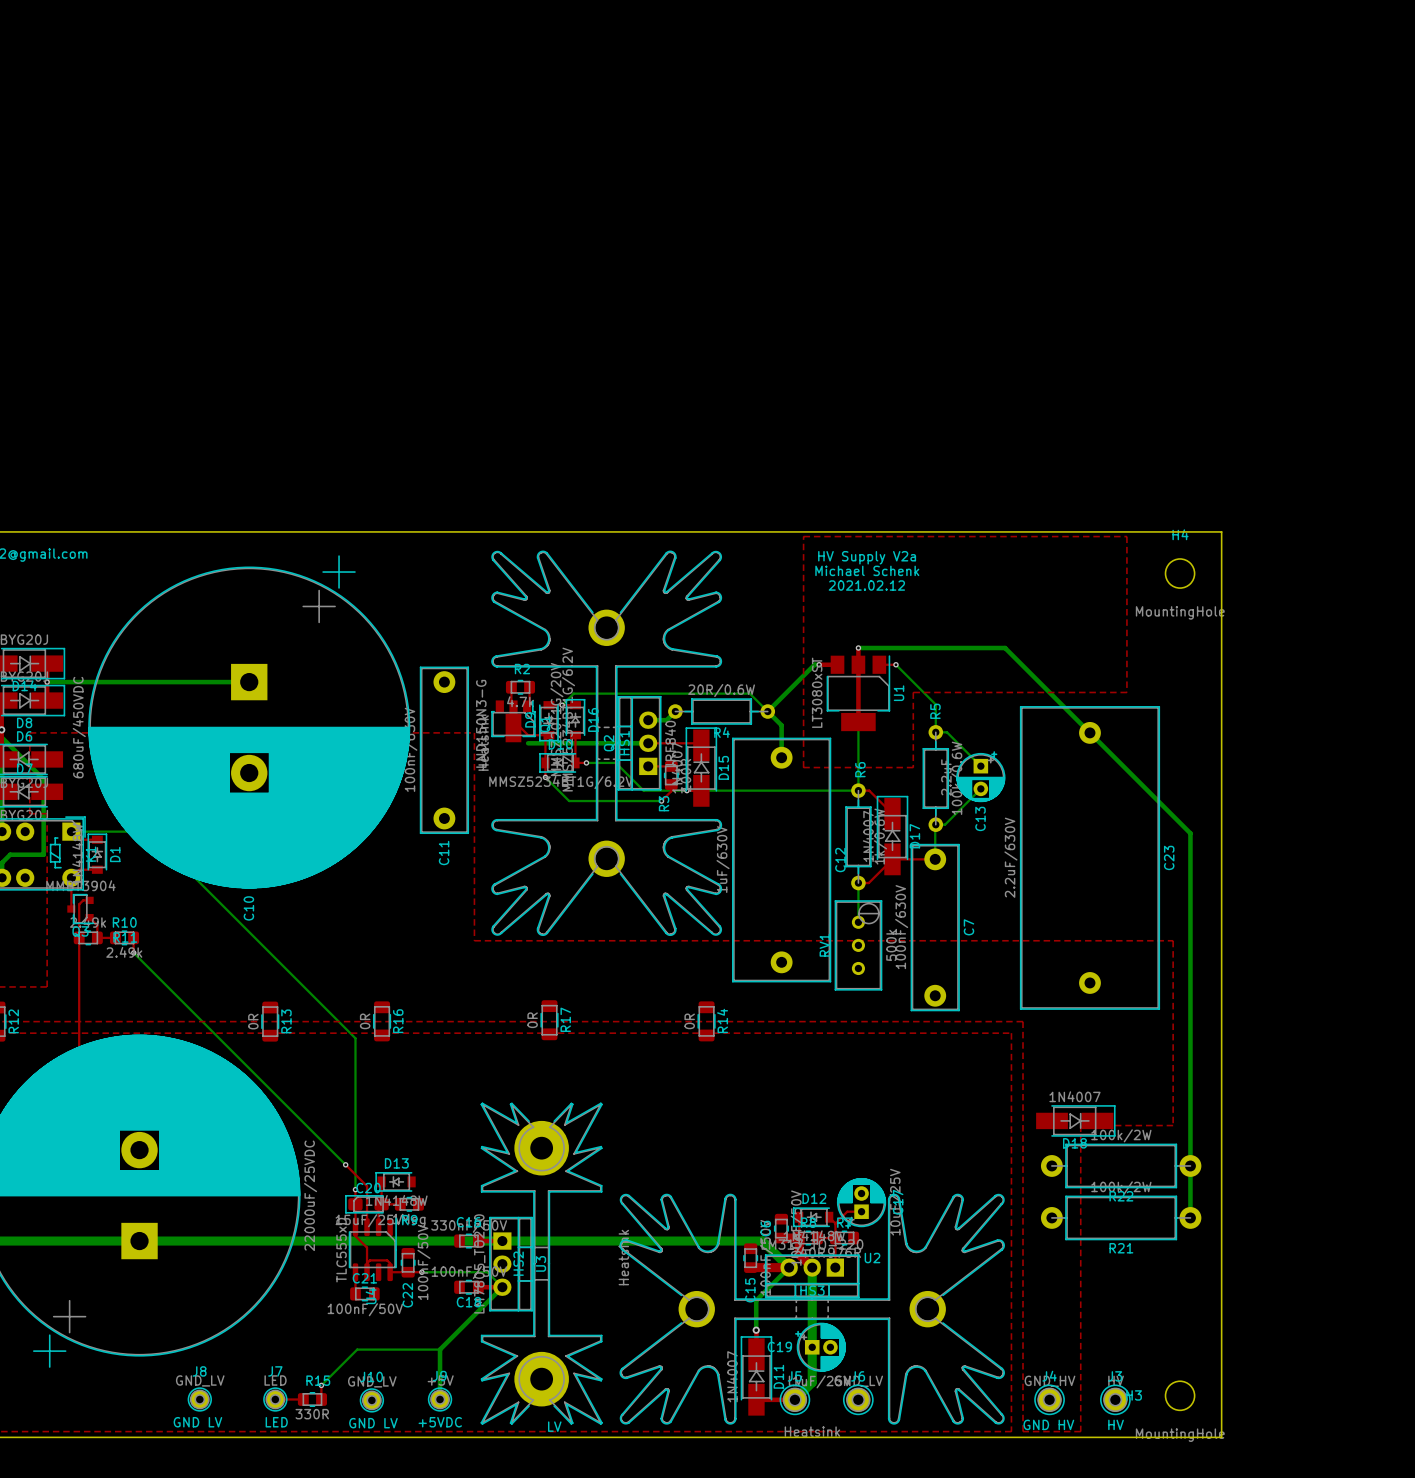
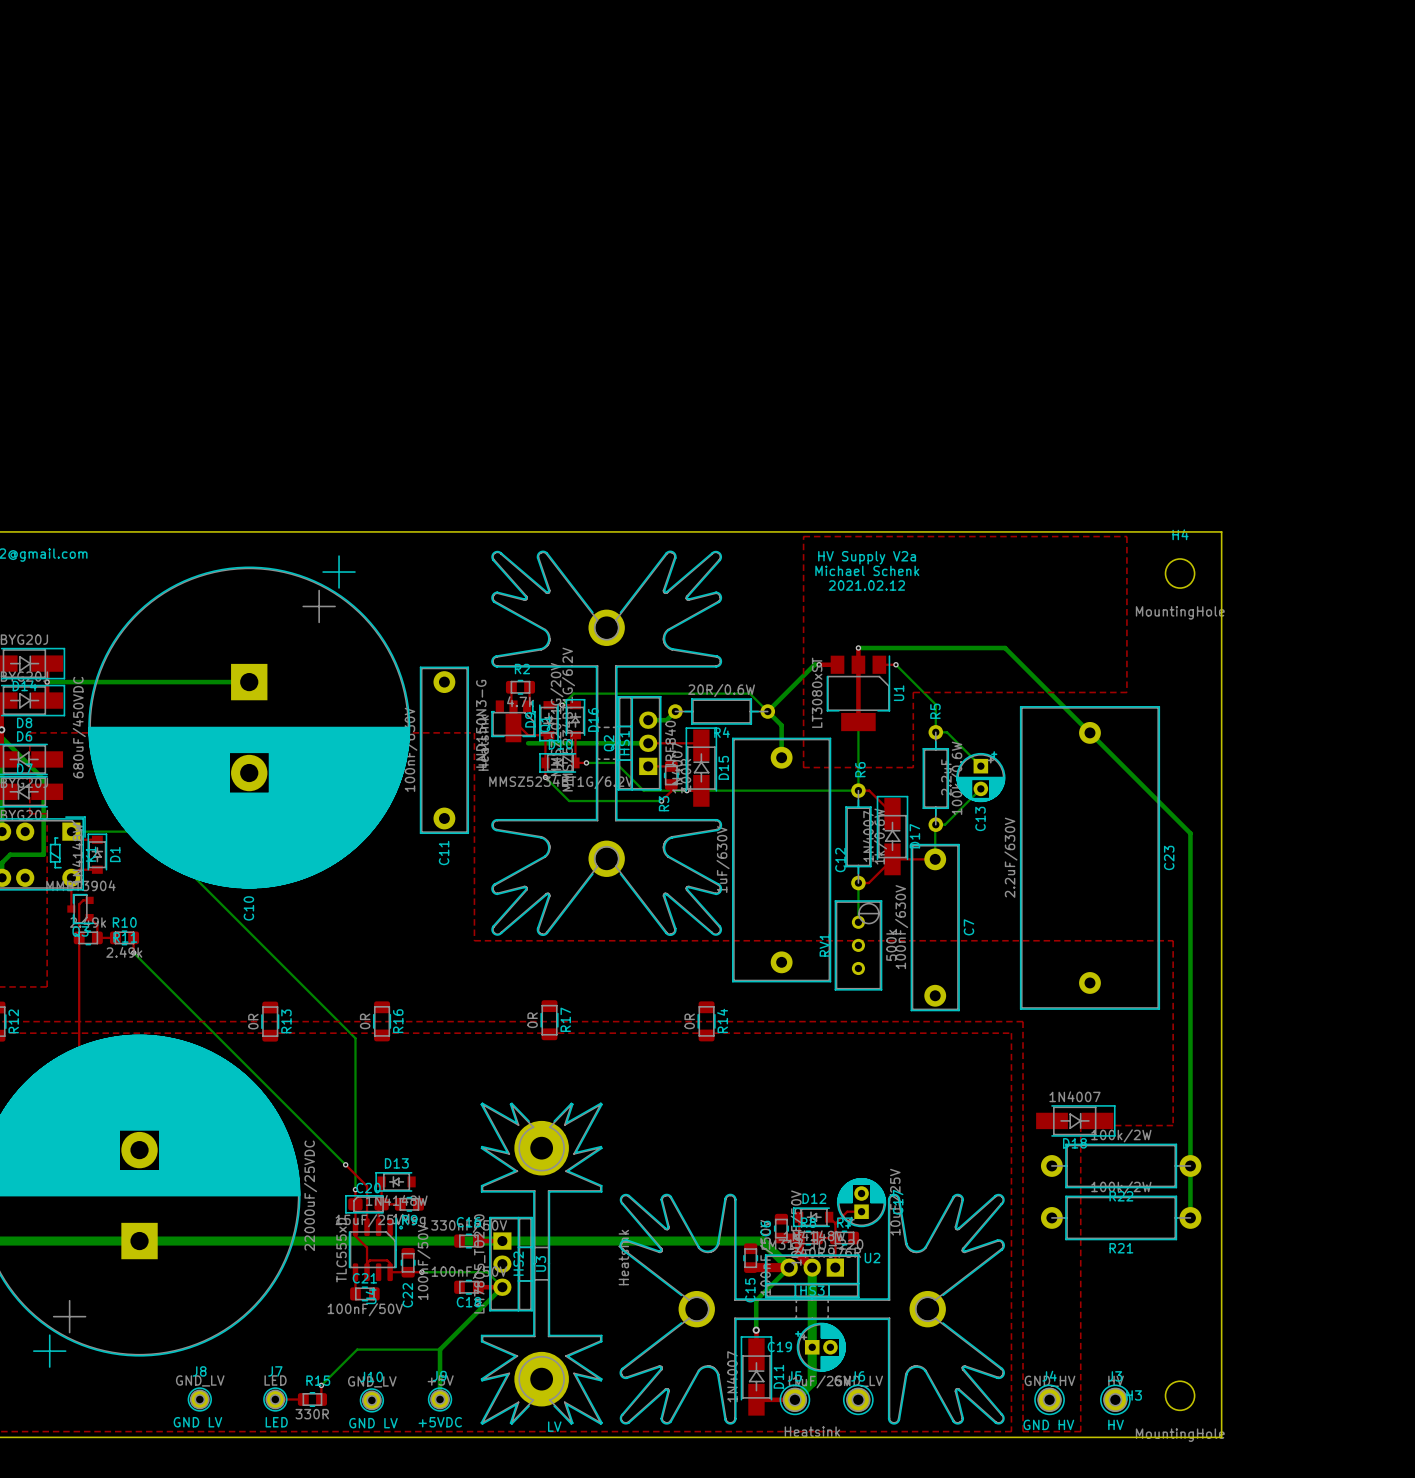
text: none -> ° (401, 1227)

